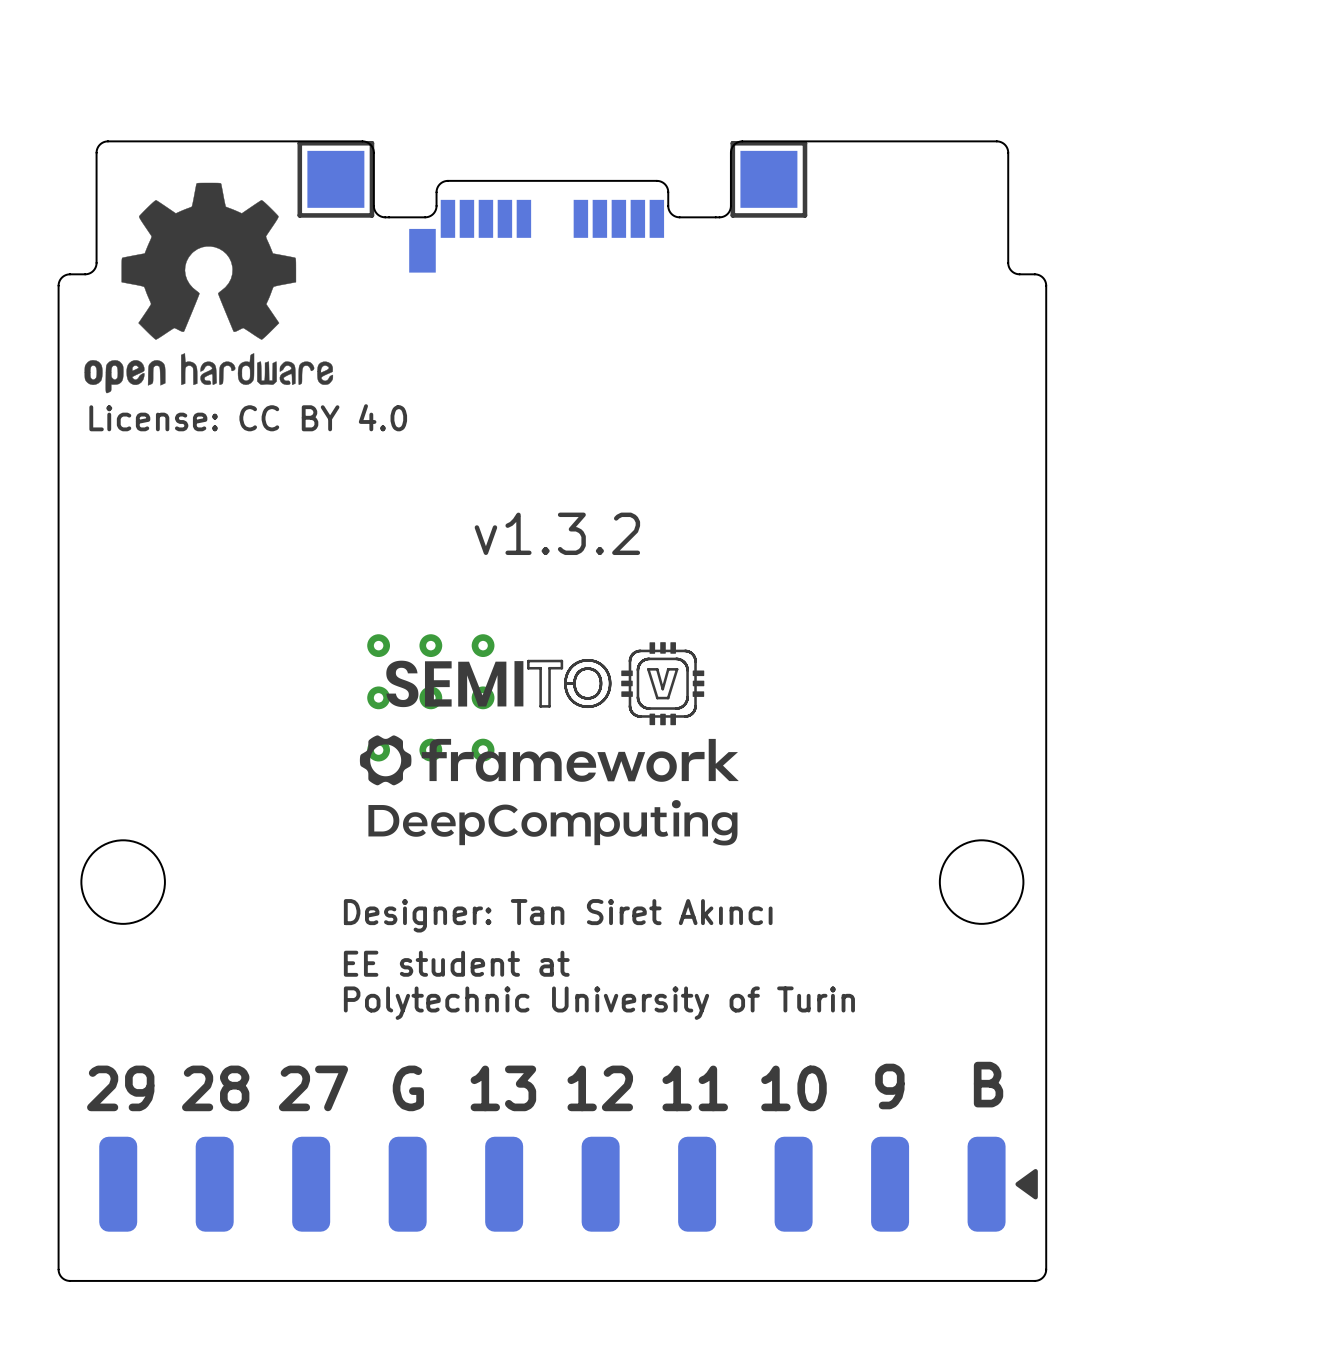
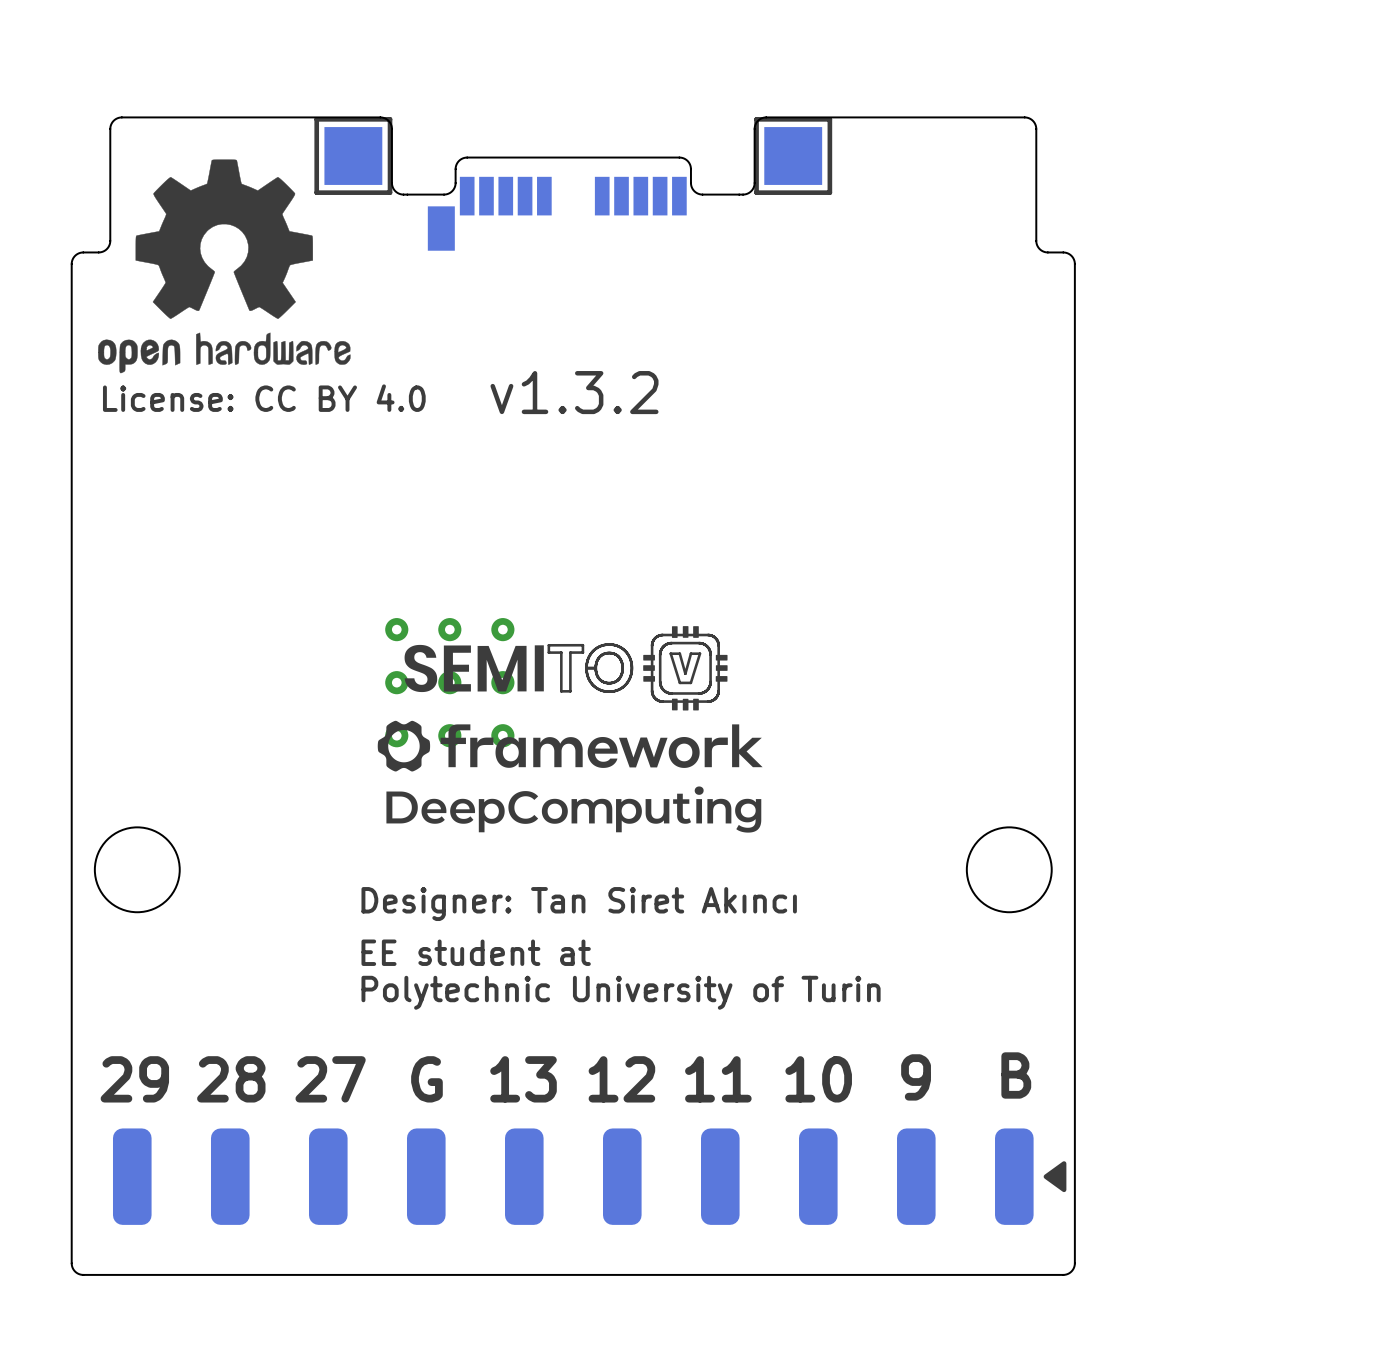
text position: v1.3.2 (557, 533) -> v1.3.2 (574, 392)

